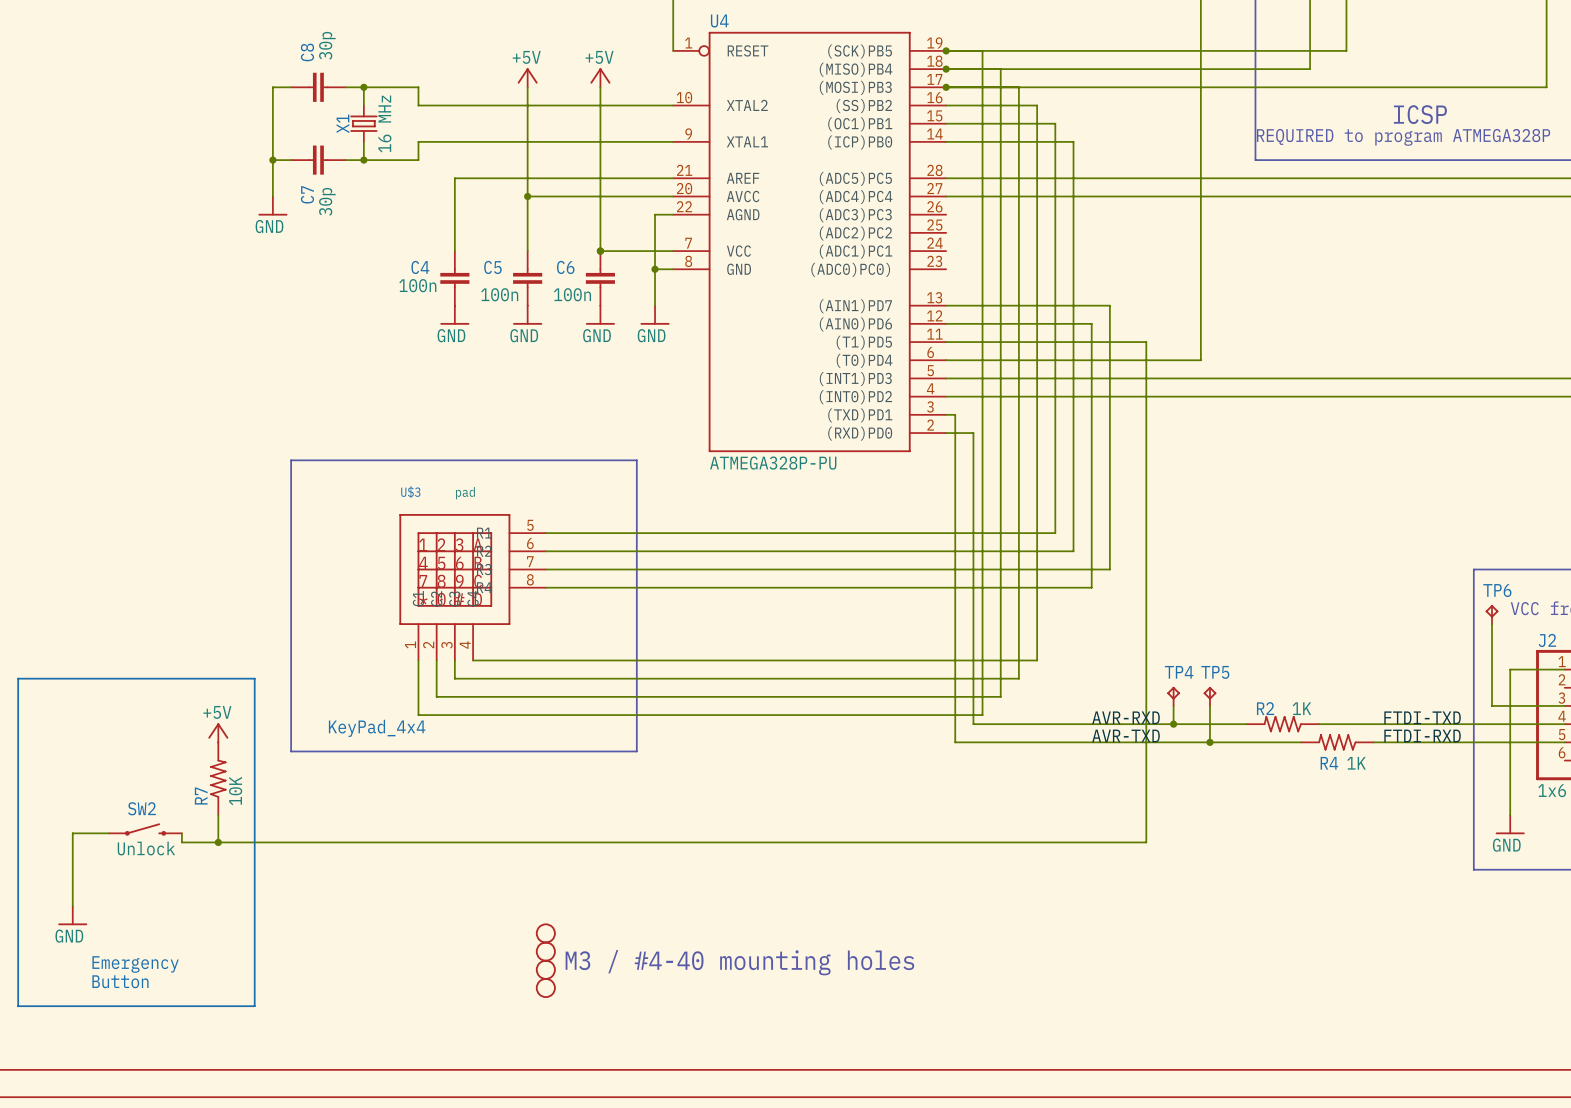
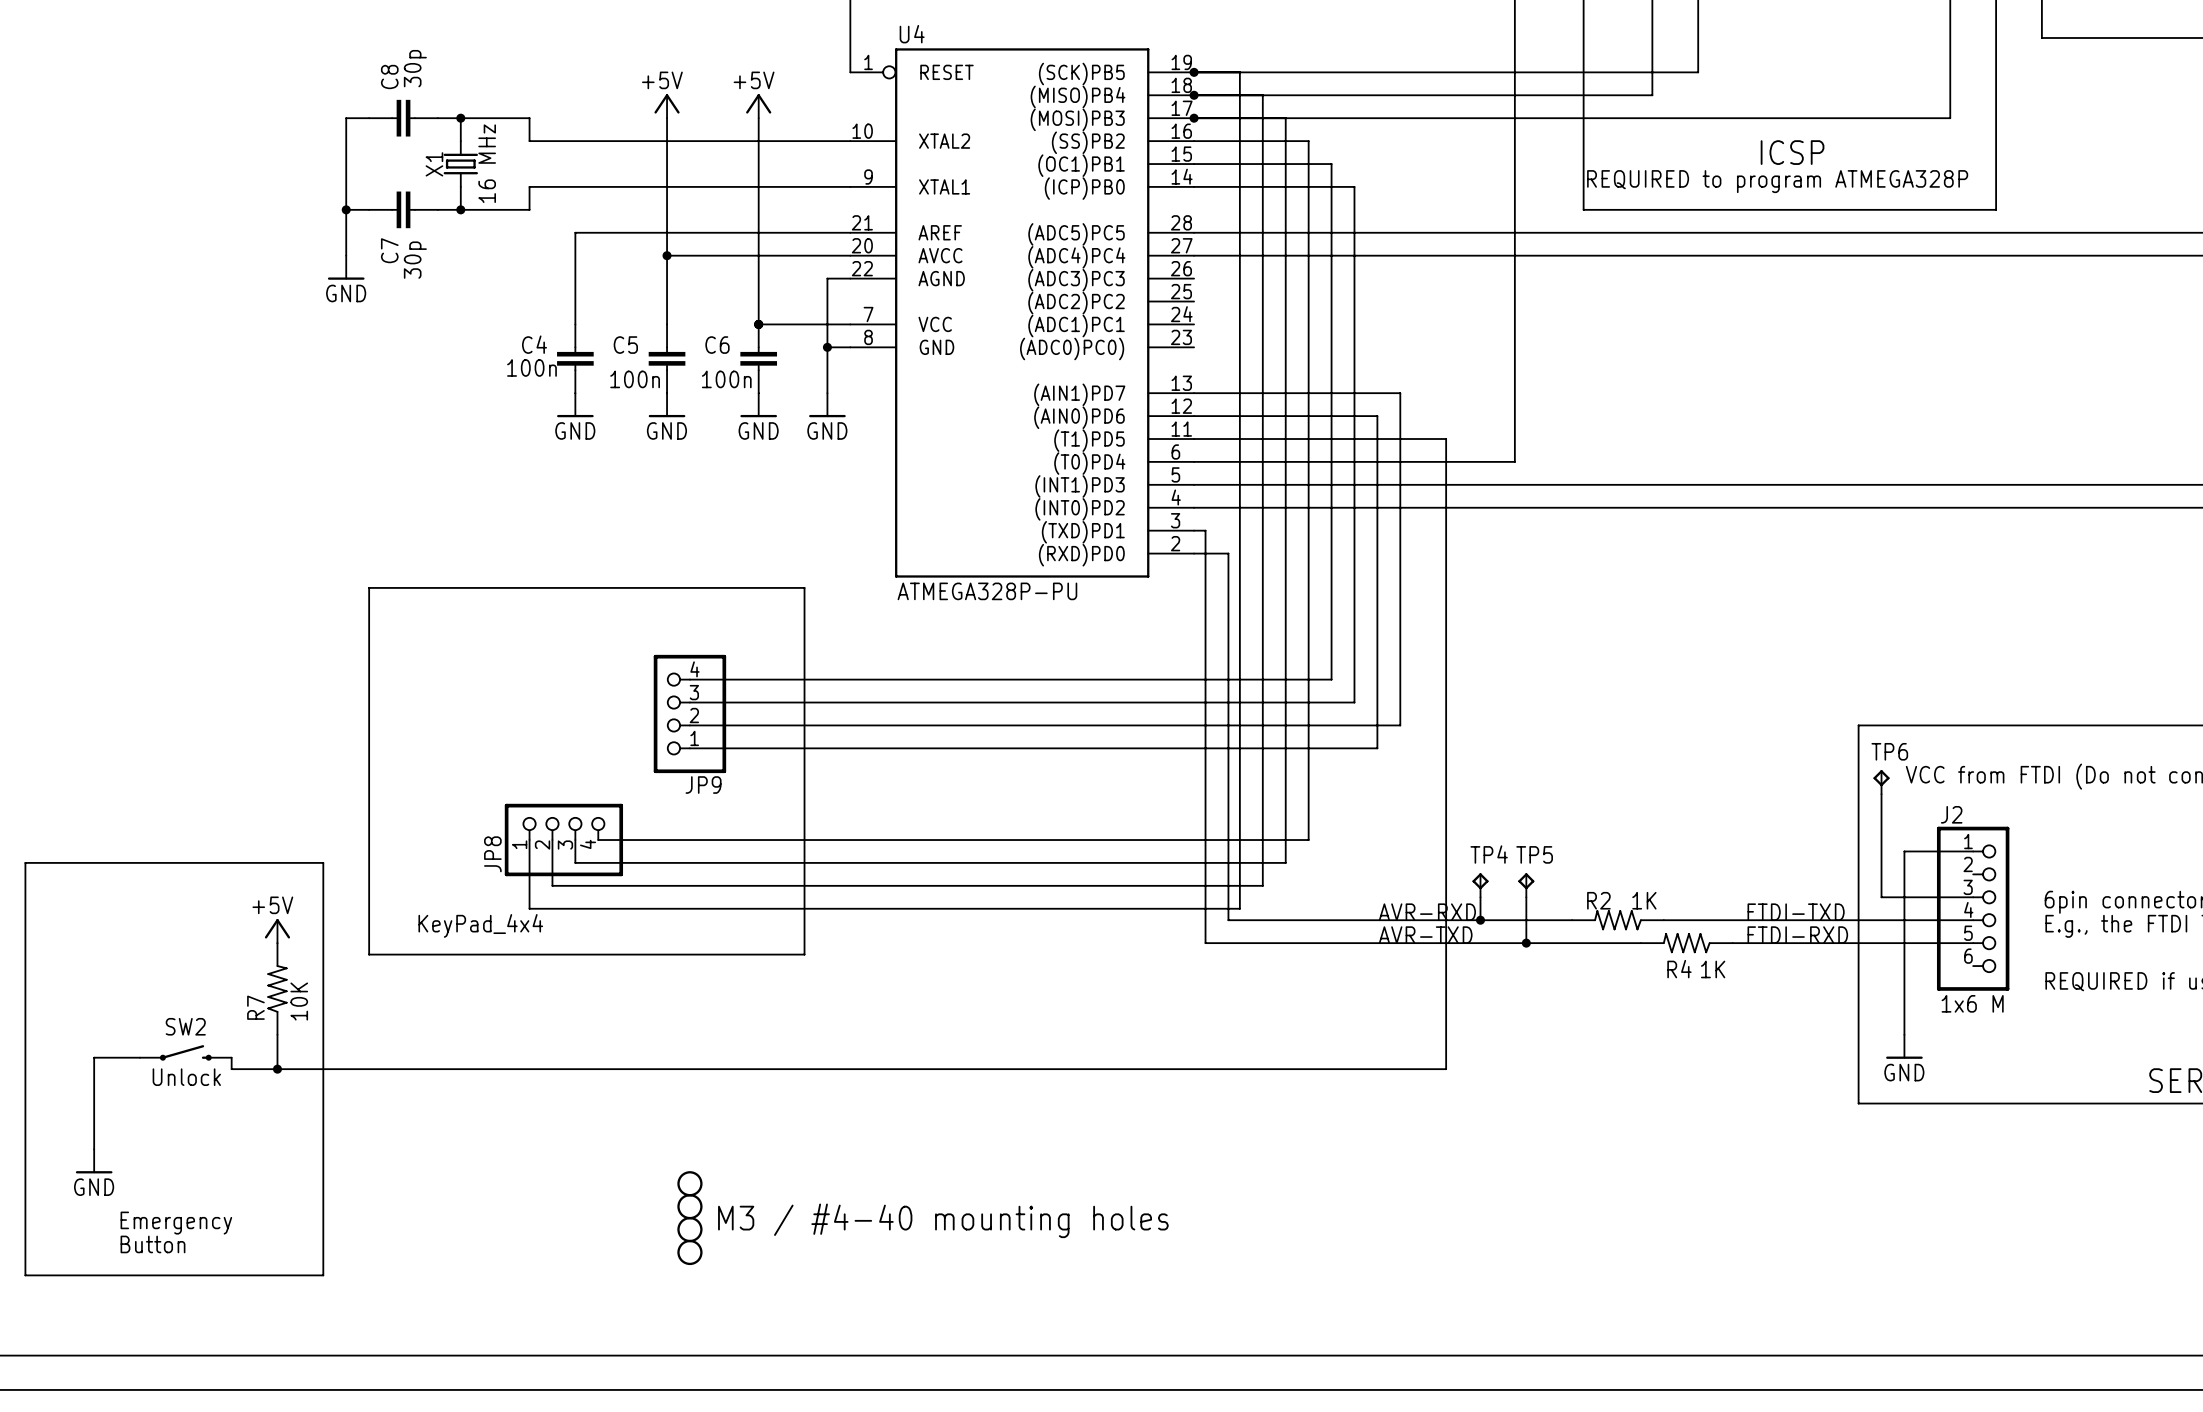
JP9: none -> (689, 713)
U$3: pad (472, 587) -> none
JP8: none -> (563, 840)

